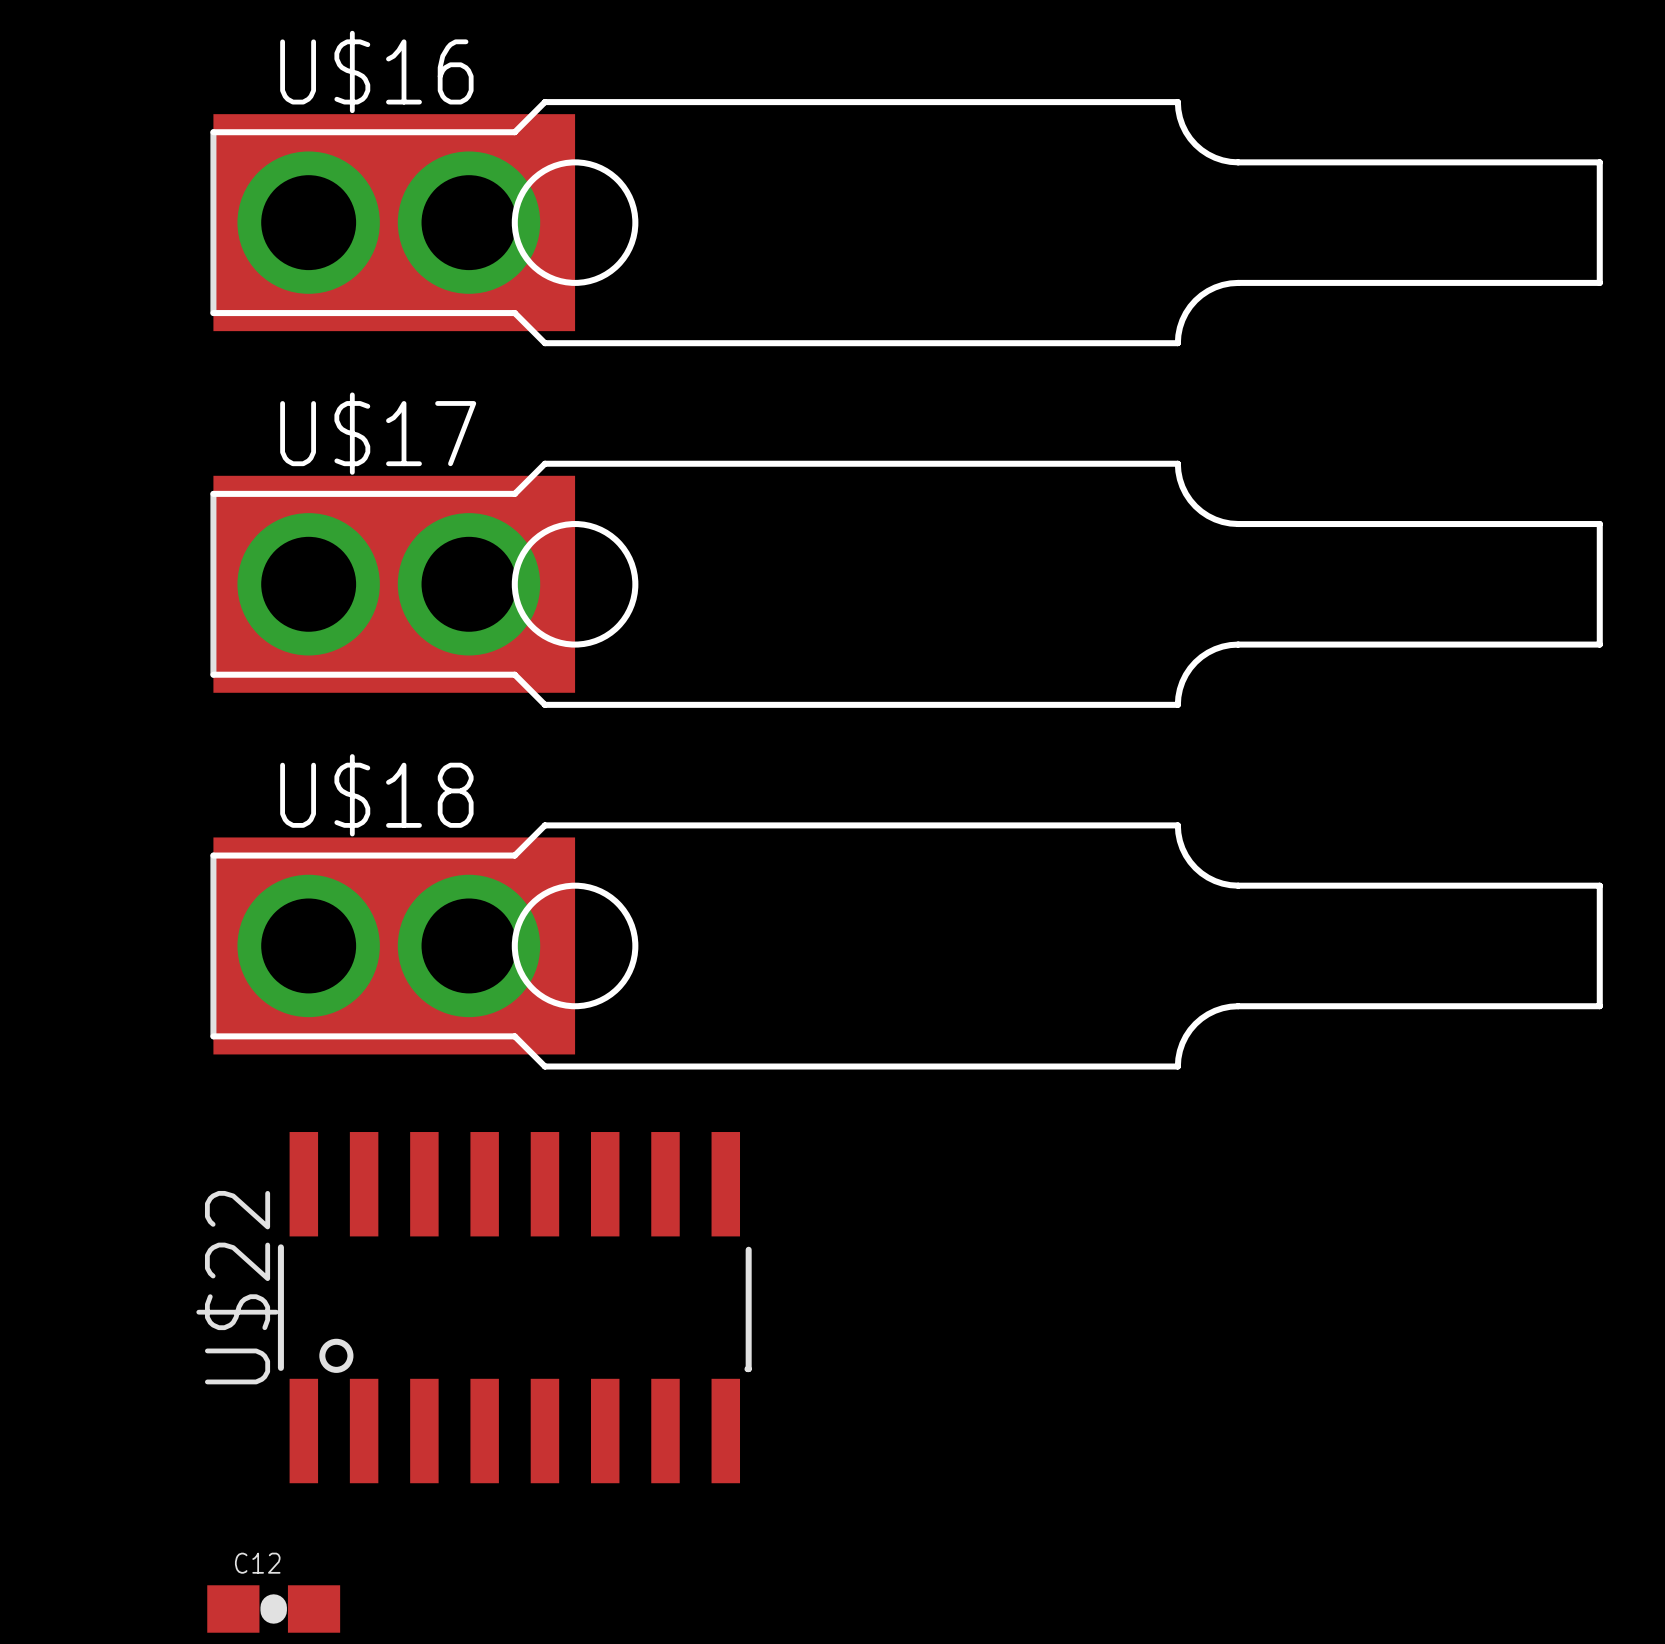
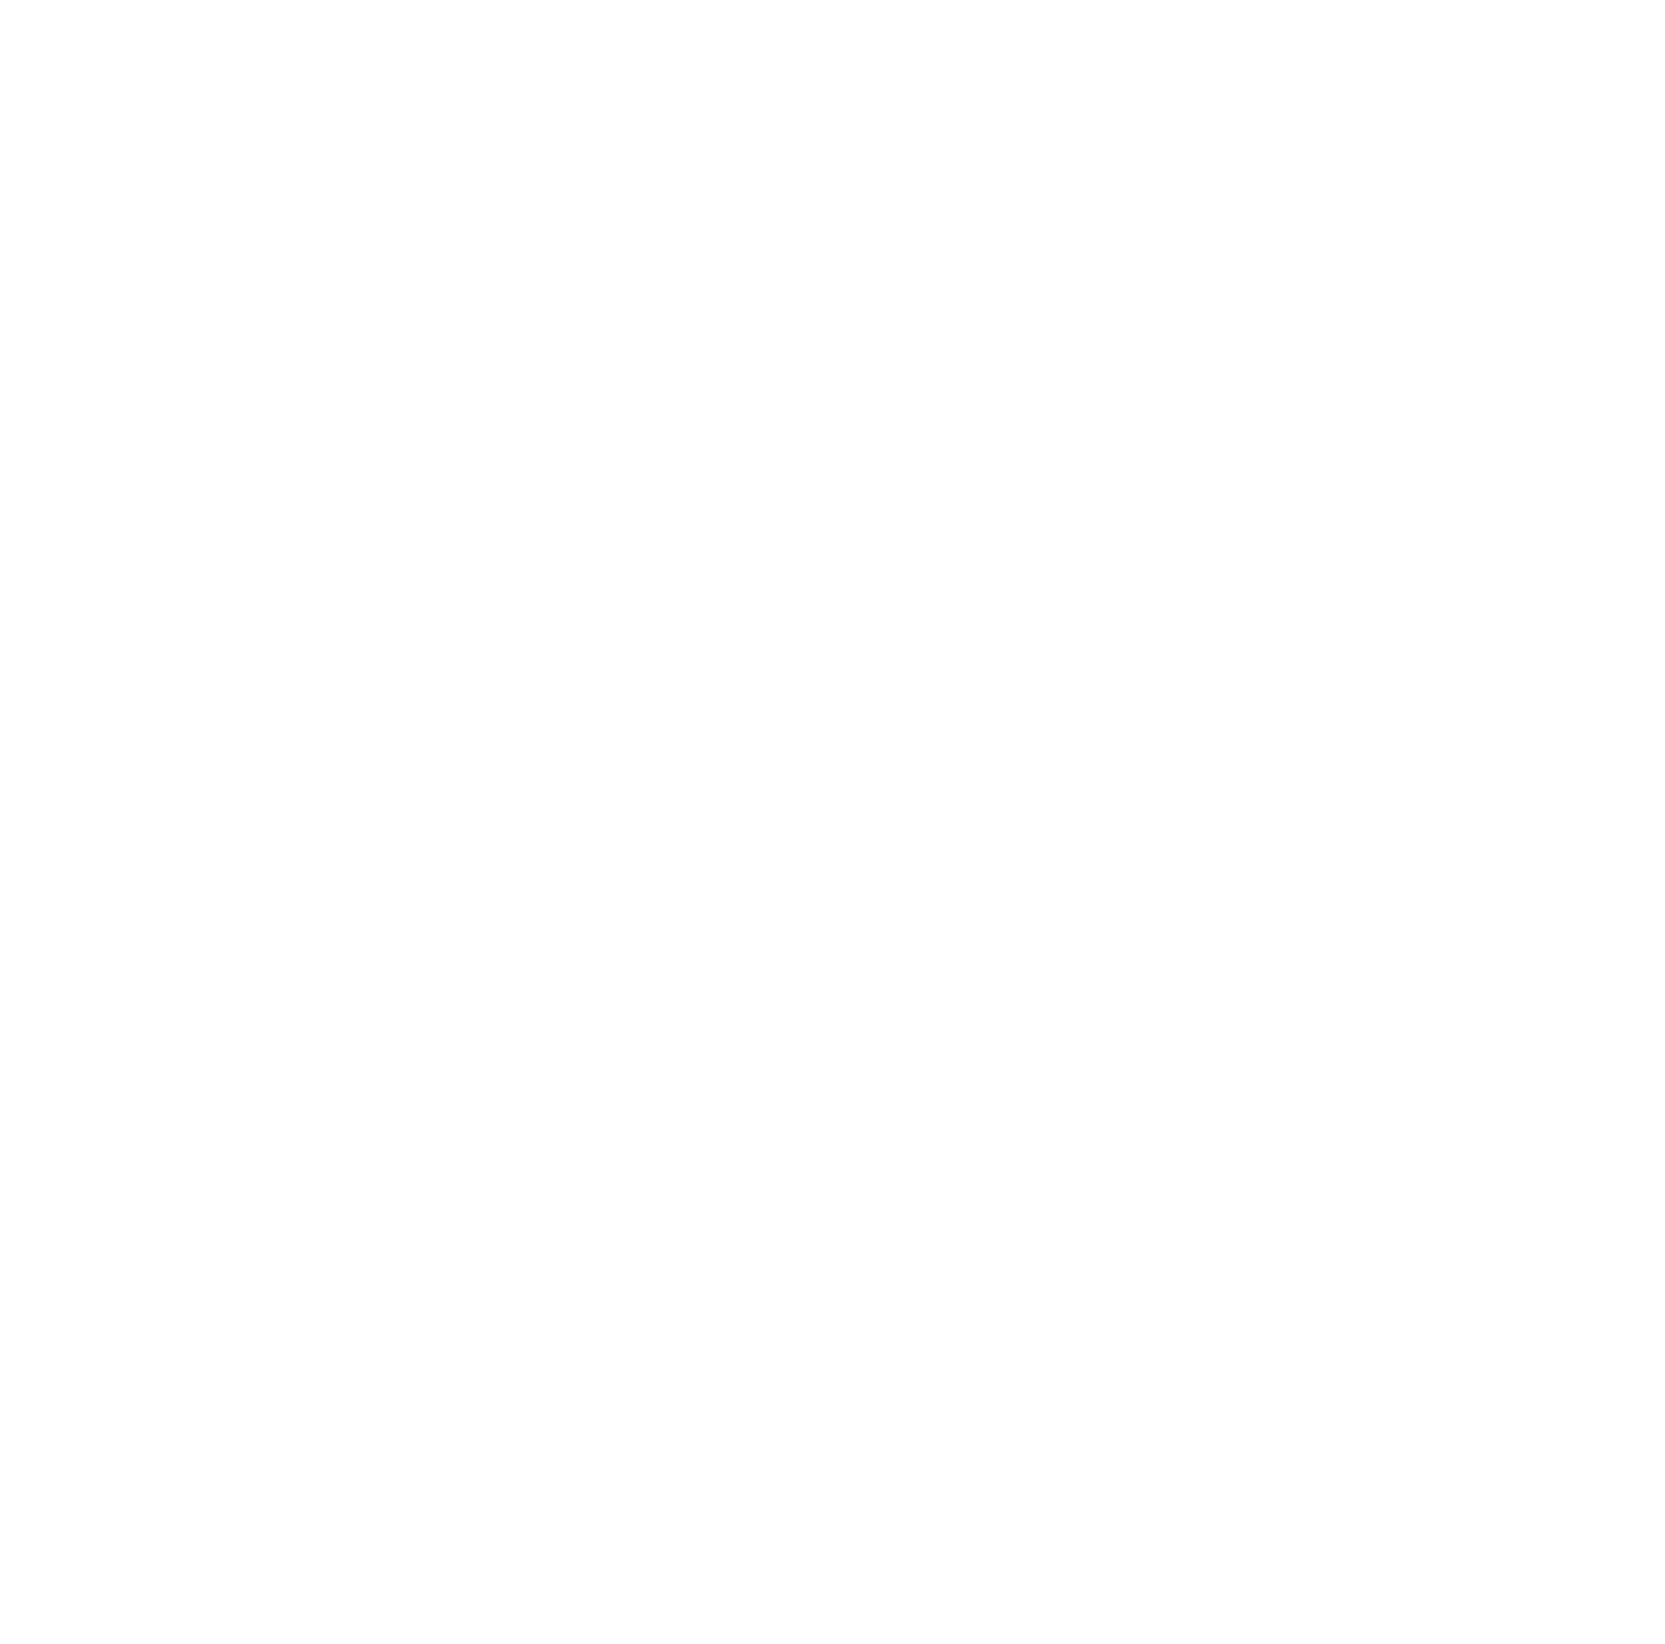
U$16: (906, 222) -> none
U$17: (906, 584) -> none
U$18: (906, 945) -> none
U$22: (514, 1307) -> none
C12: (273, 1609) -> none

